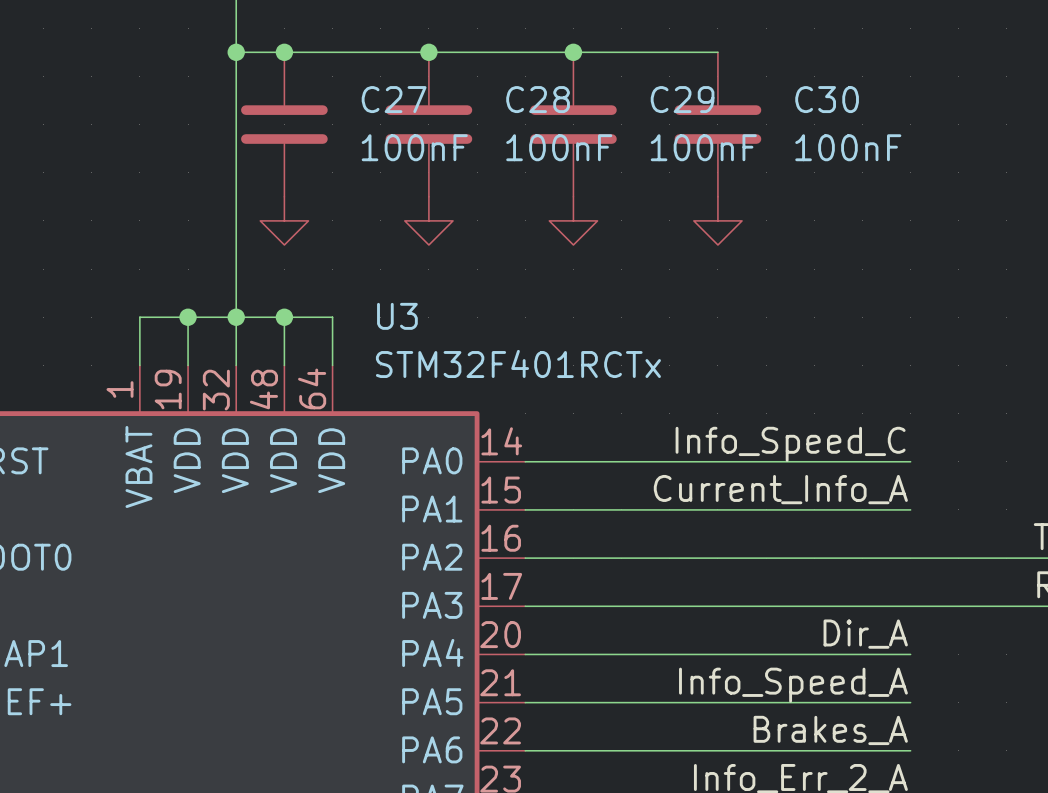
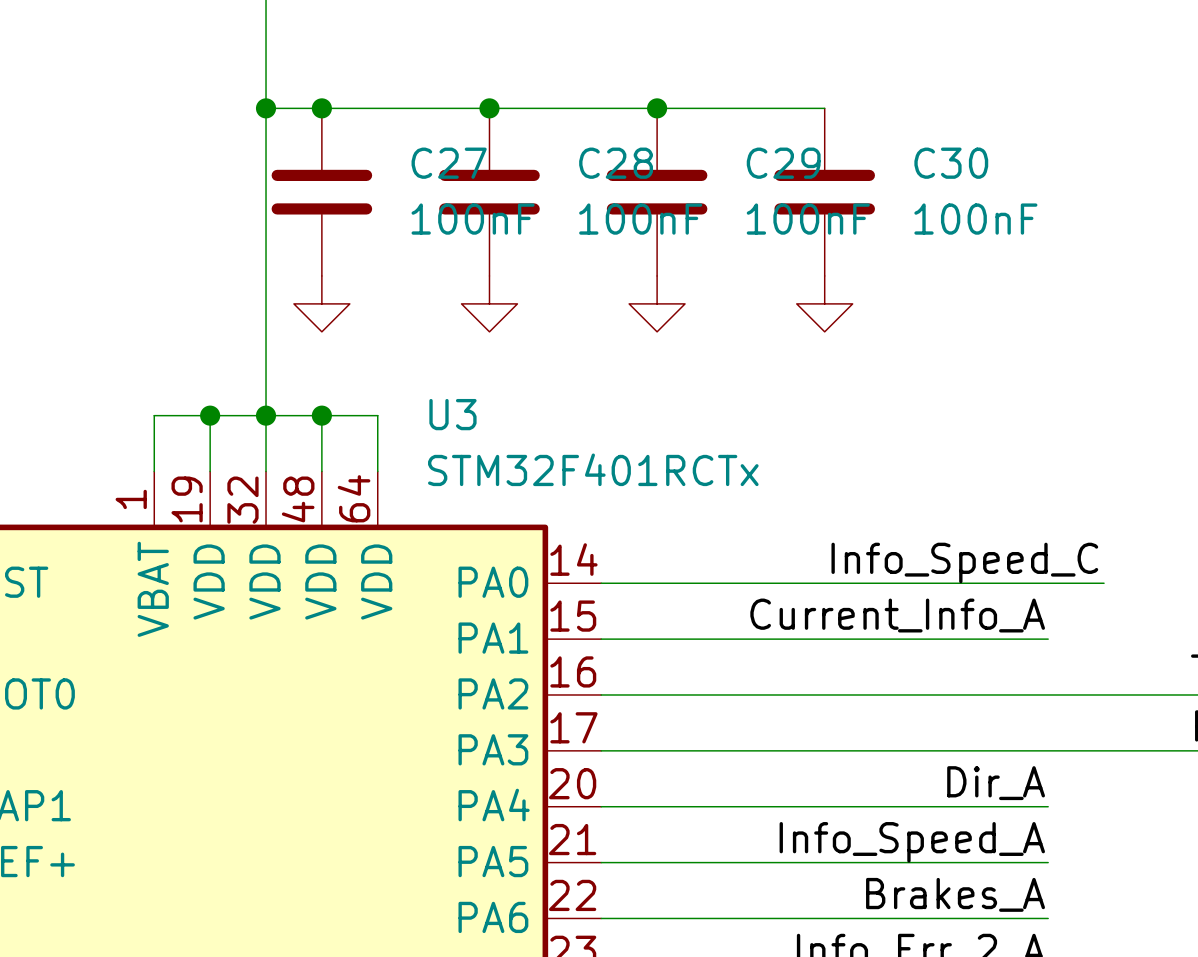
label position: Info_Speed_C (790, 444) -> Info_Speed_C (964, 562)
wire: none -> (1048, 583) (1104, 583)

